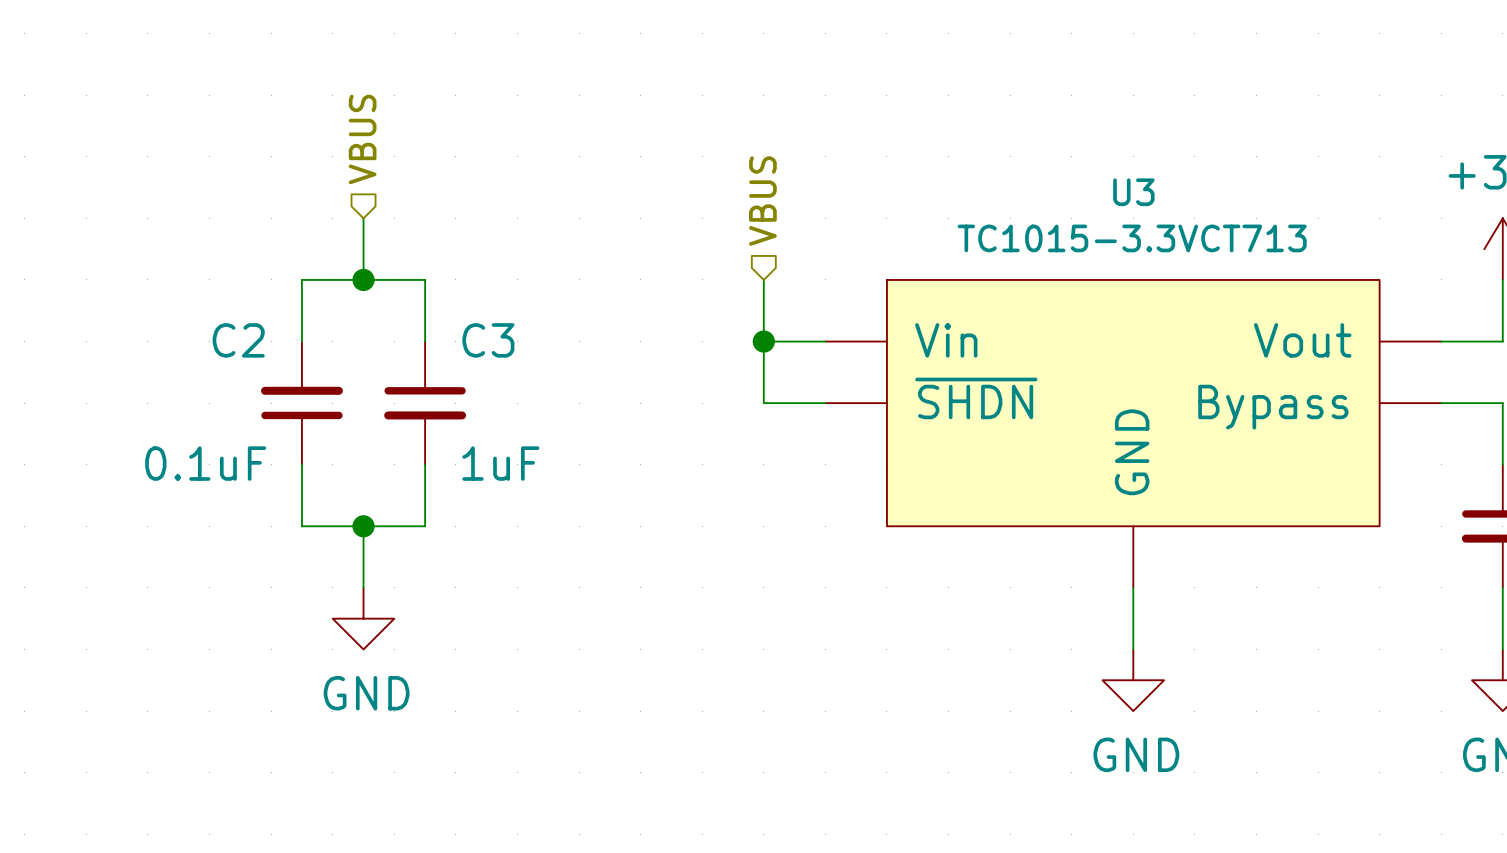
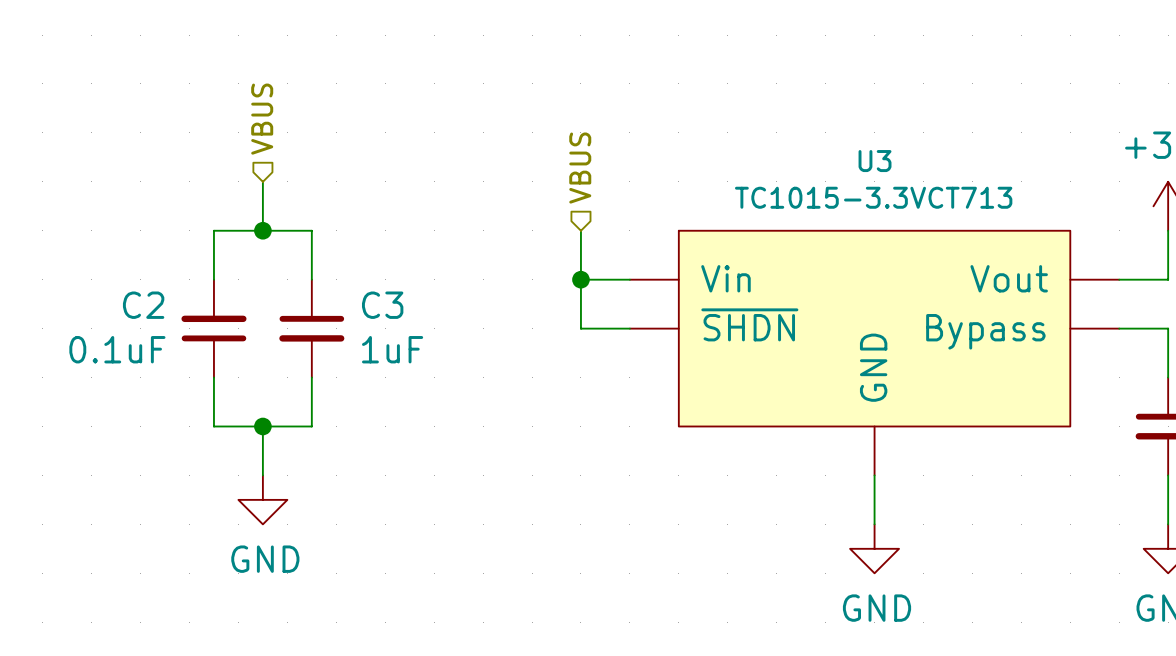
C2 name position: C2 (238, 340) -> C2 (143, 305)
C3 name position: C3 (488, 340) -> C3 (382, 305)
C2 value position: 0.1uF (205, 463) -> 0.1uF (117, 349)
C3 value position: 1uF (500, 463) -> 1uF (392, 349)

